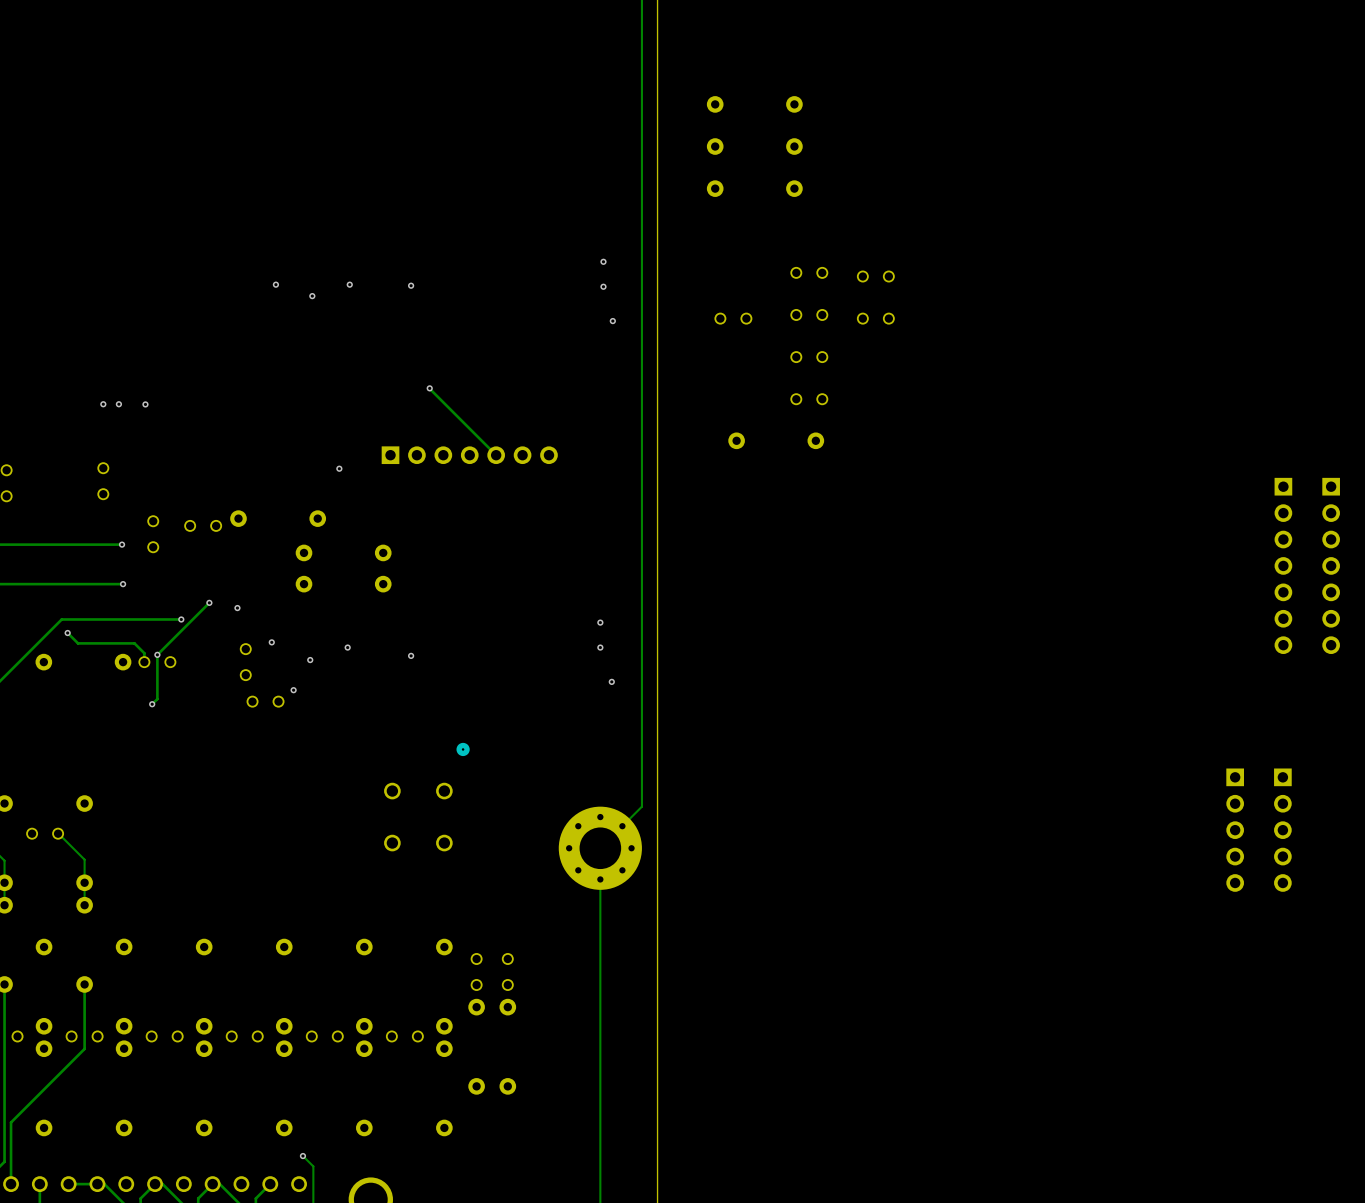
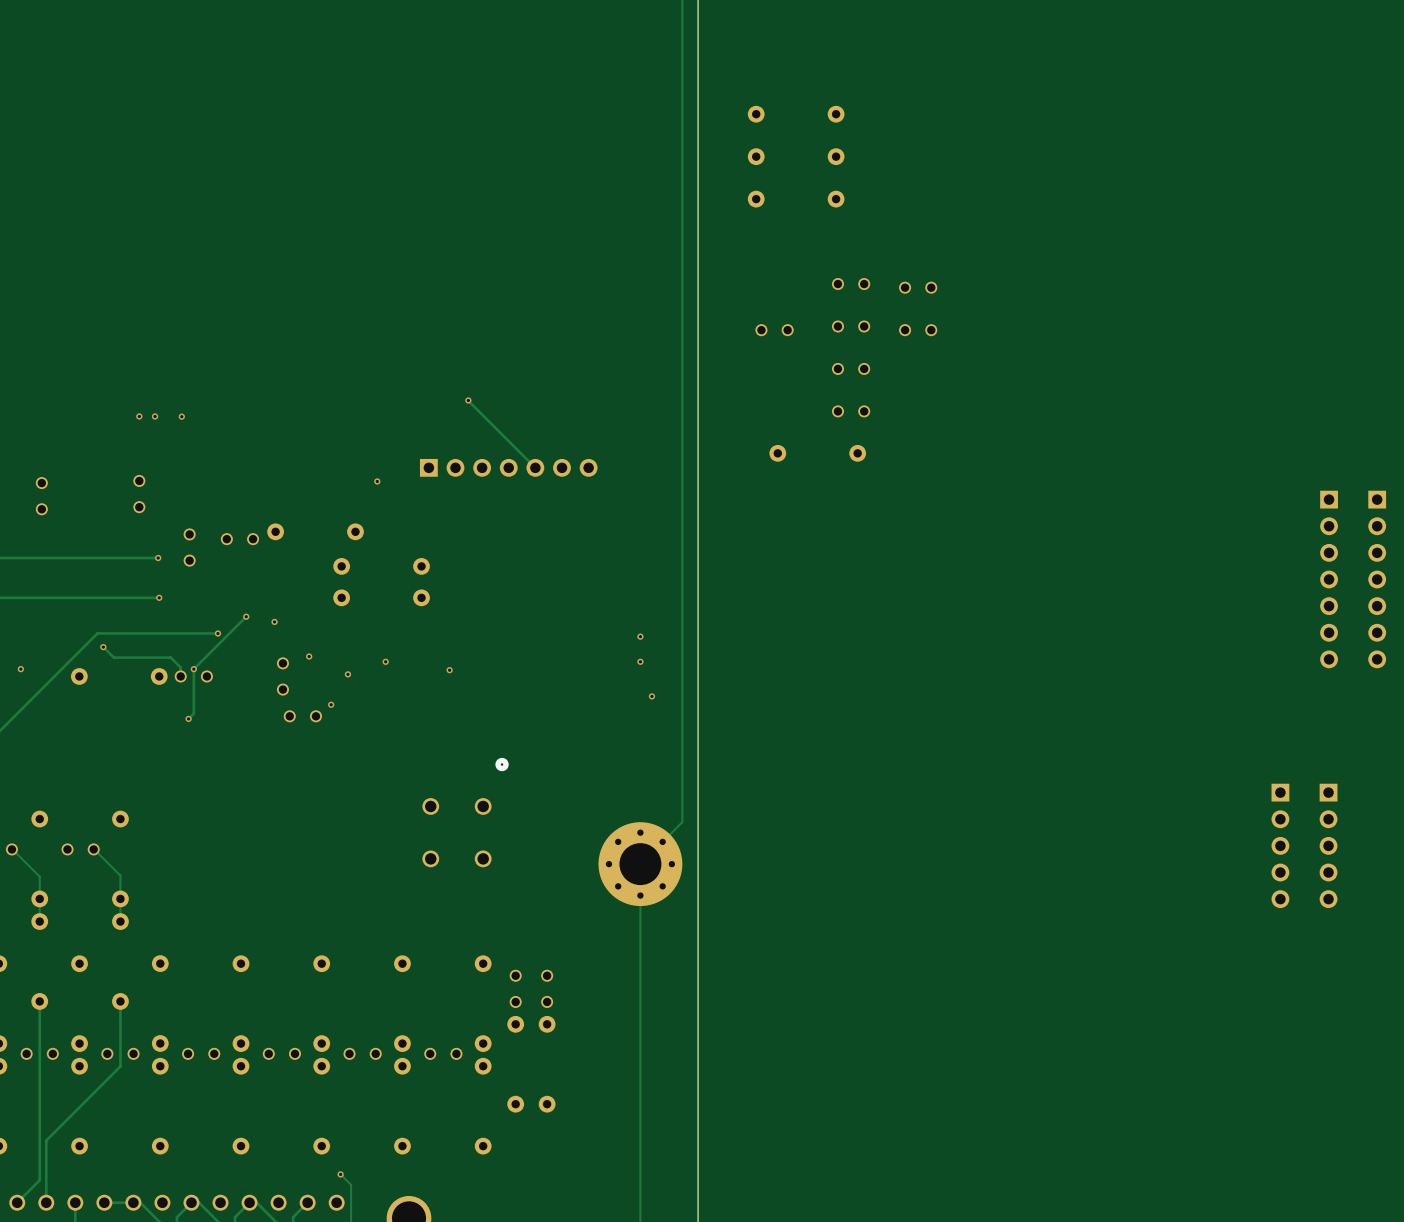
via: (603, 261) -> none
via: (275, 284) -> none
via: (349, 284) -> none
via: (411, 285) -> none
via: (603, 286) -> none
via: (312, 296) -> none
via: (612, 321) -> none

